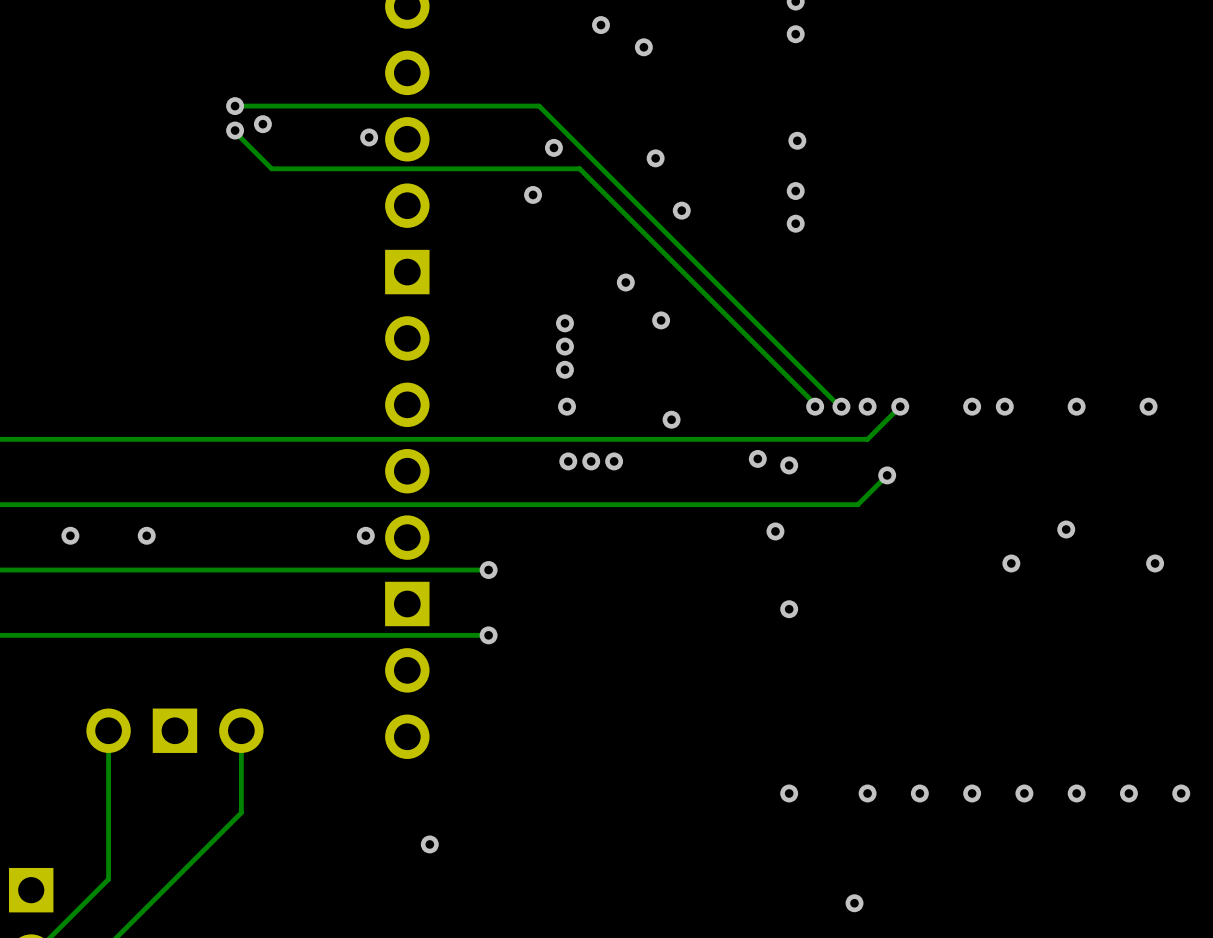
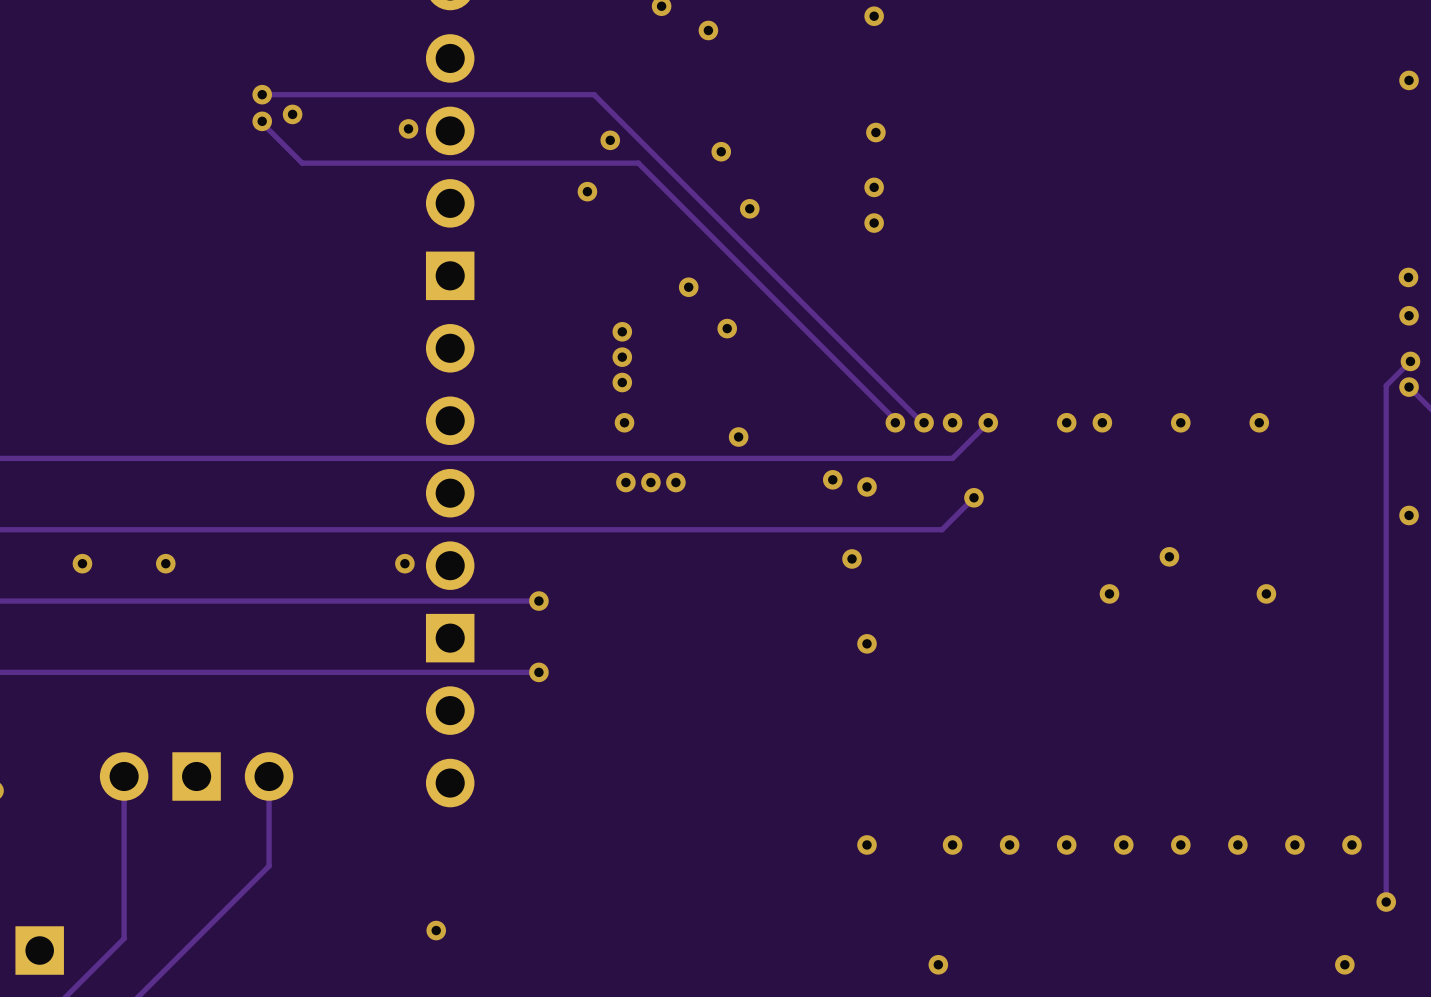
via position: (429, 844) -> (436, 930)

